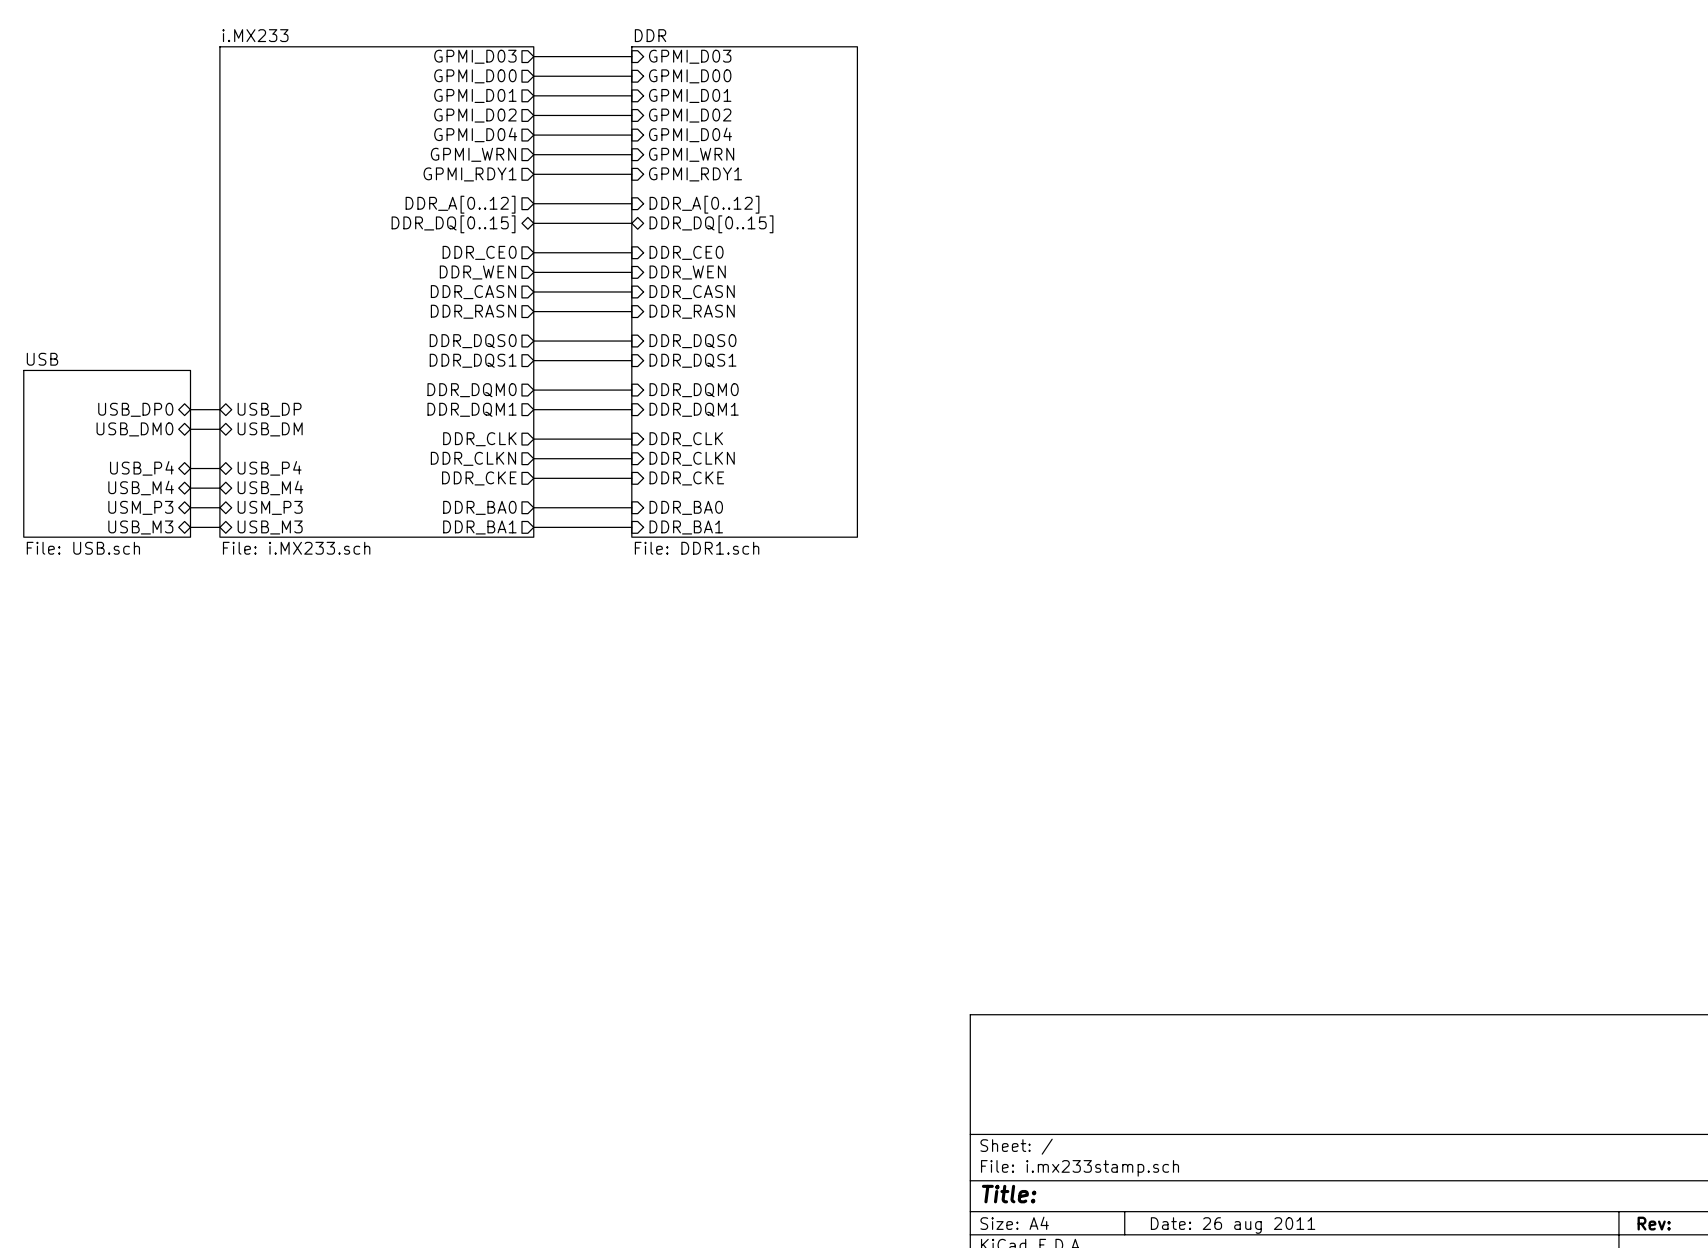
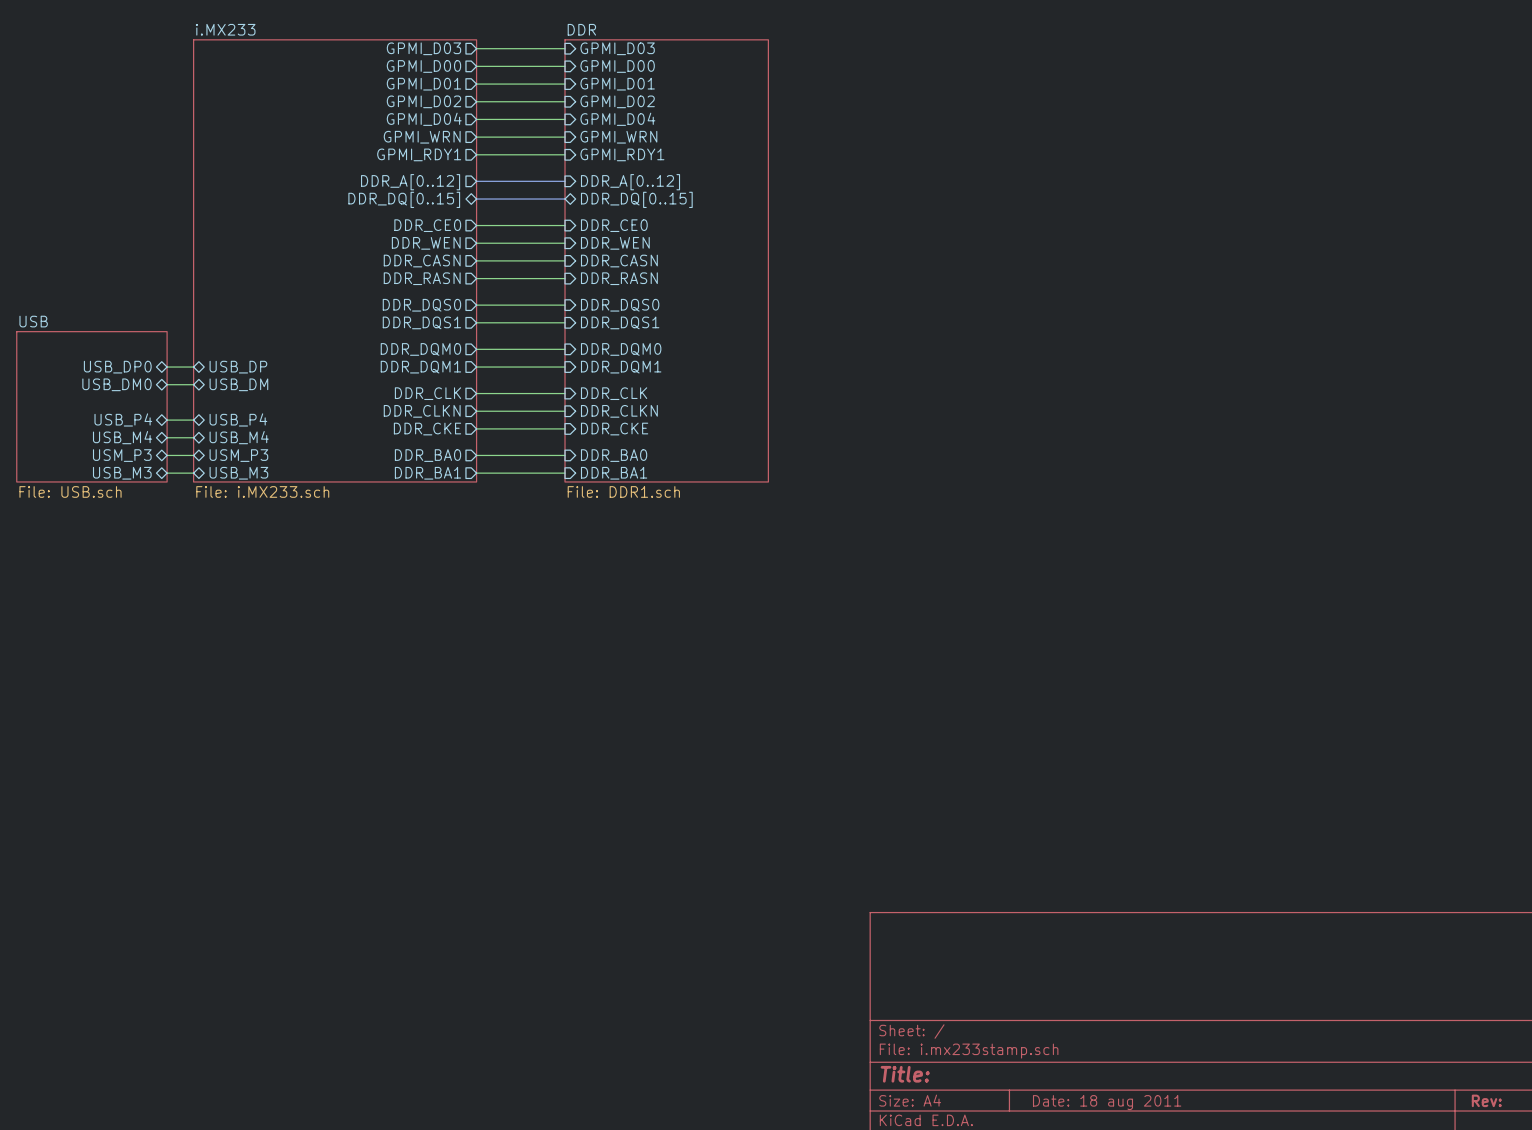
title block: Date: 26 aug 2011 (1233, 1225) -> Date: 18 aug 2011 (1107, 1102)

